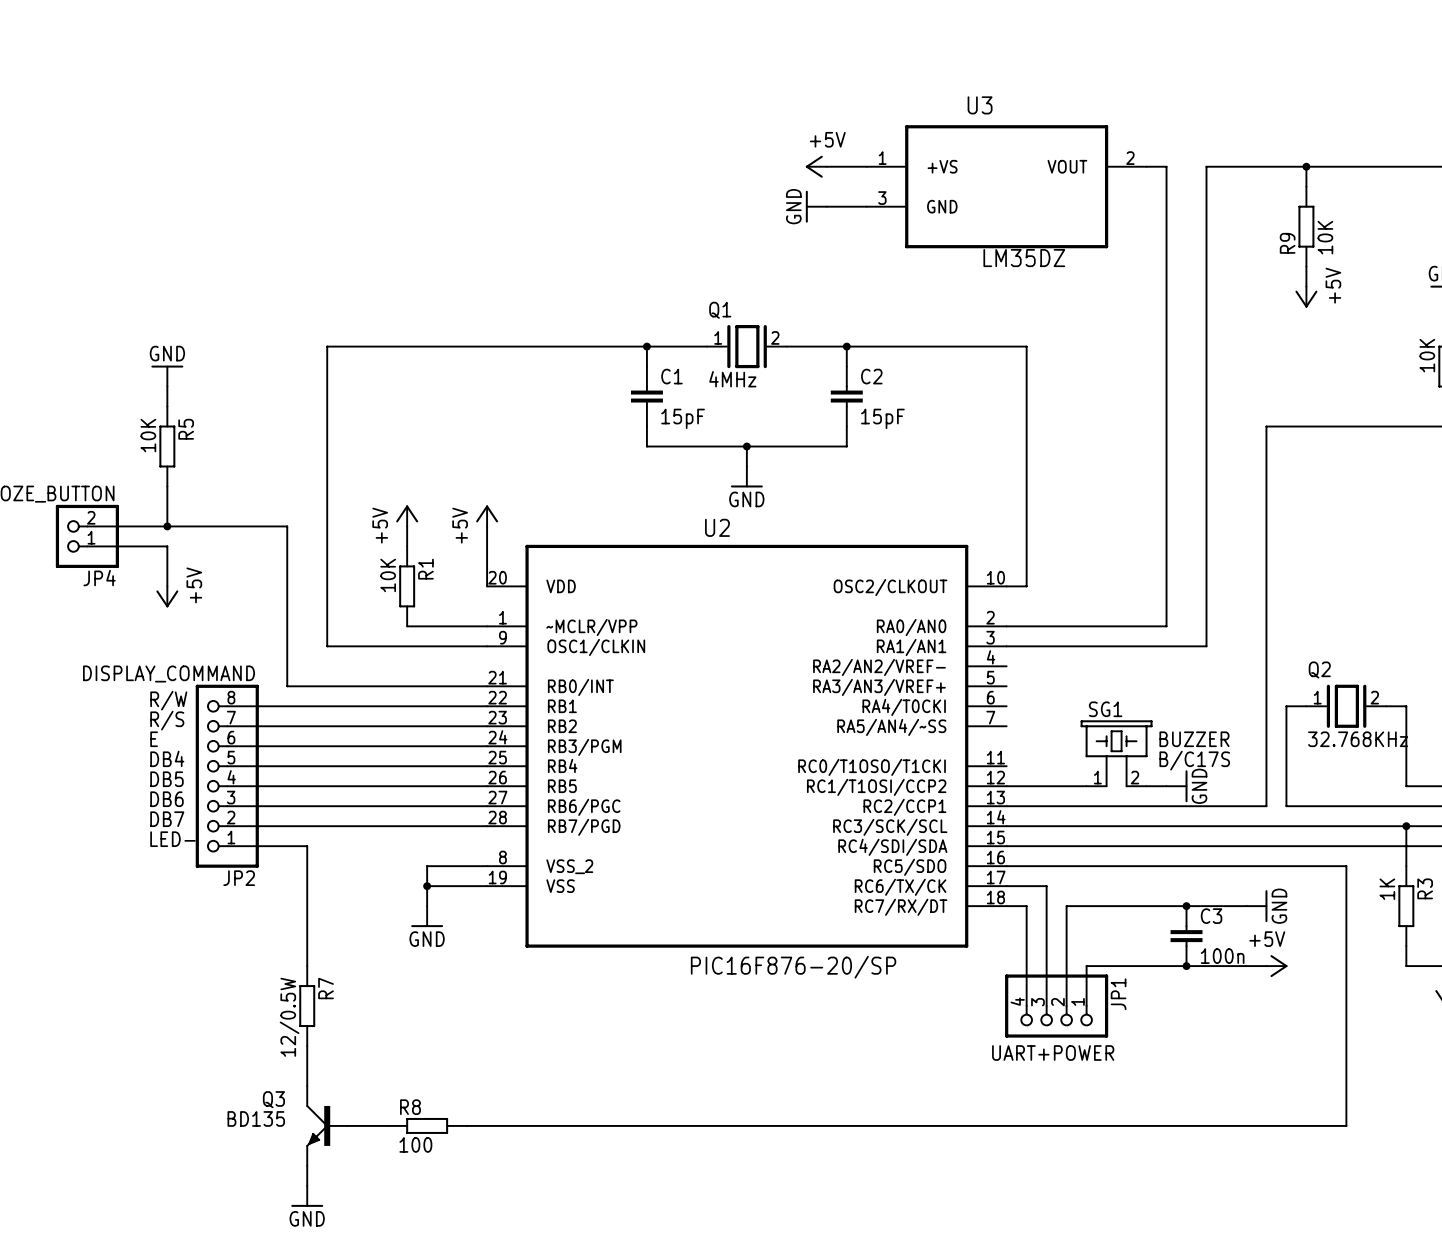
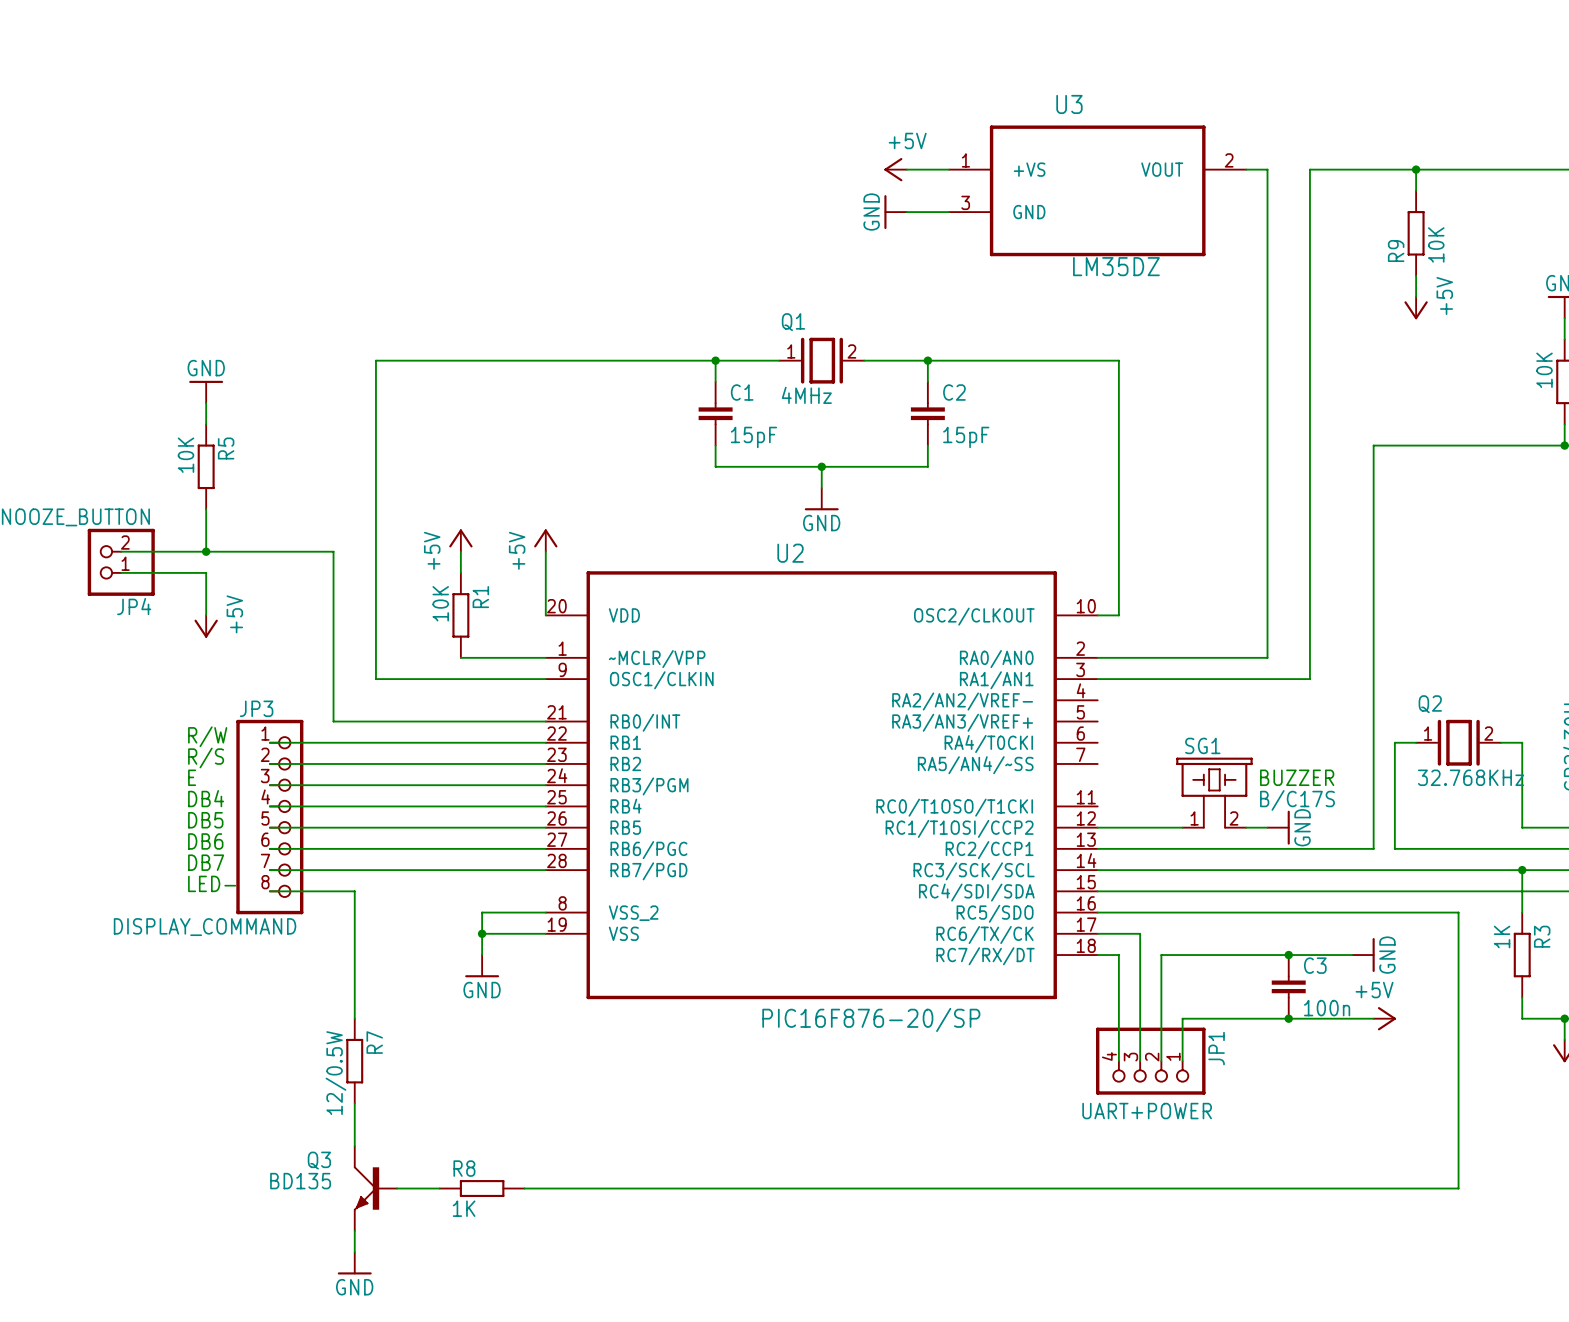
JP2: DISPLAY_COMMAND (227, 776) -> none
JP3: none -> DISPLAY_COMMAND (269, 817)
R8 value: 100 (415, 1144) -> 1K (464, 1208)

